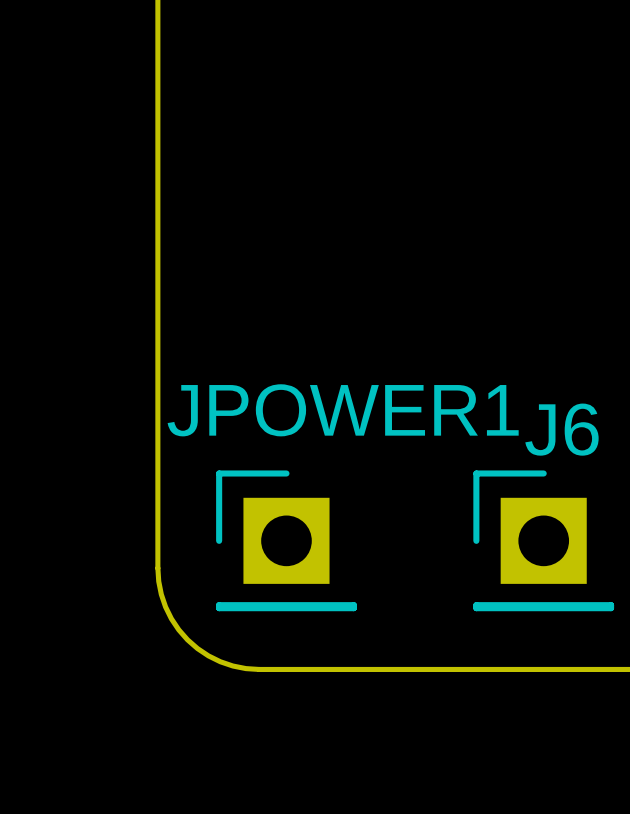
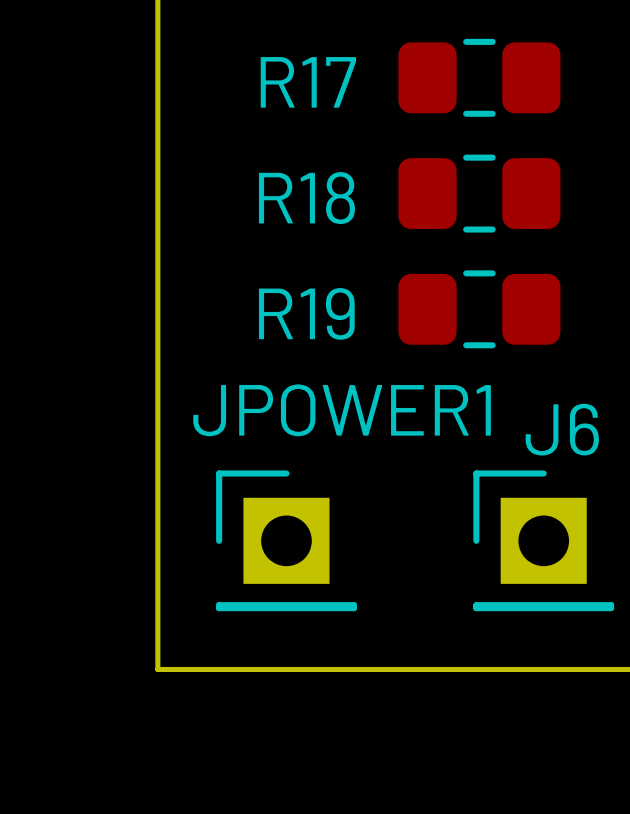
R17: none -> (479, 77)
R18: none -> (479, 193)
R19: none -> (479, 309)
board edge: (157, 568) (158, 581) (165, 606) (178, 629) (187, 639) (208, 655) (220, 661) (232, 666) (259, 669) -> (157, 568) (157, 669) (259, 669)

